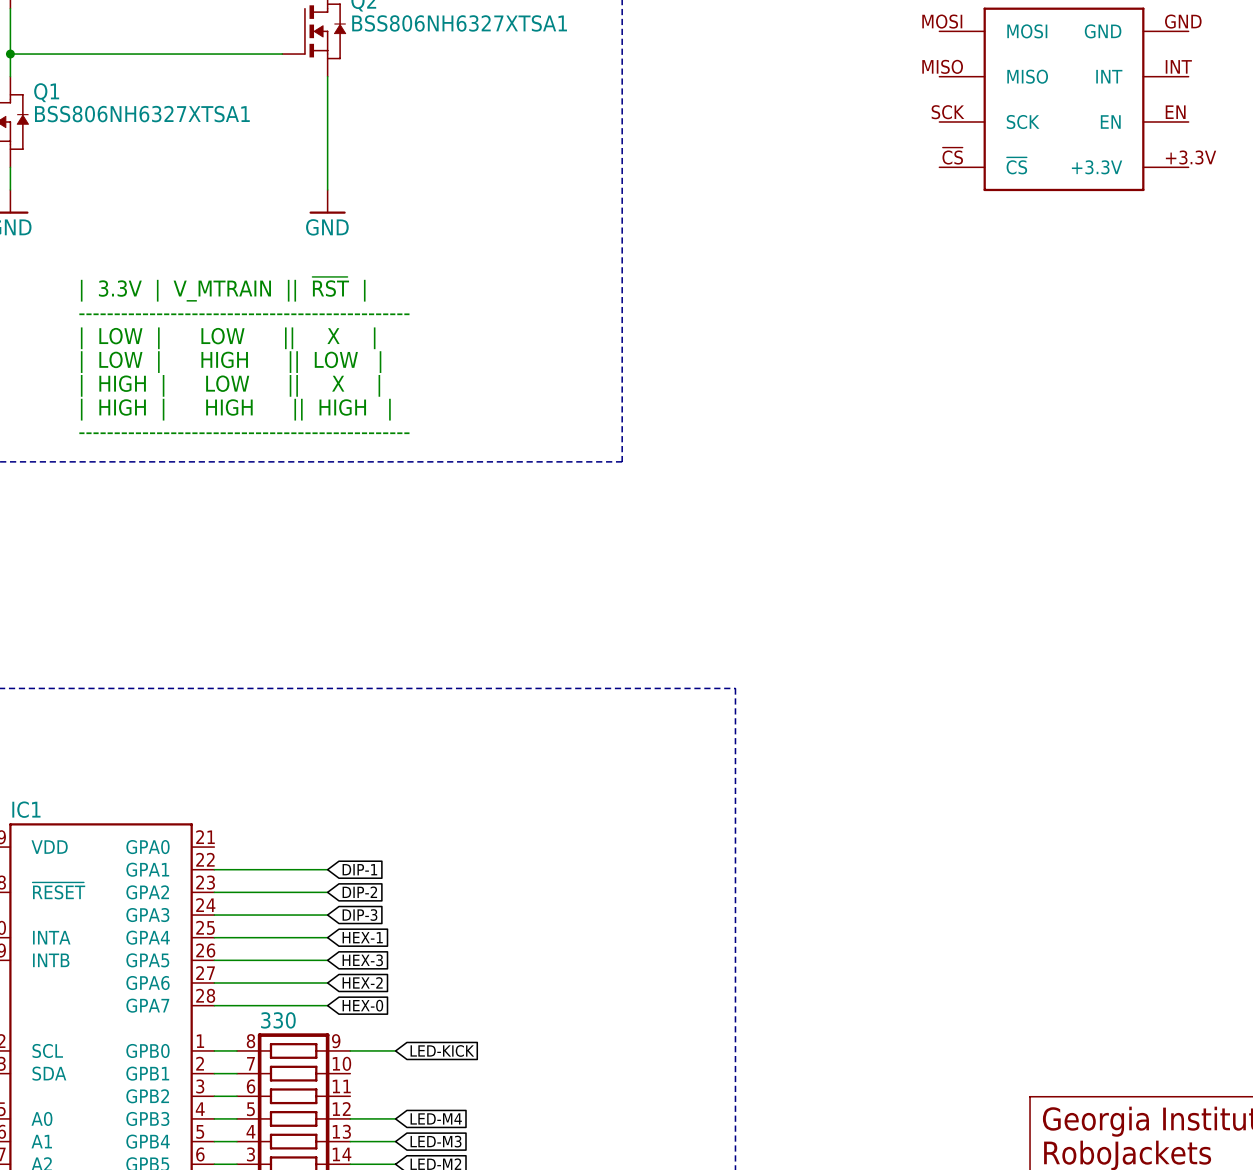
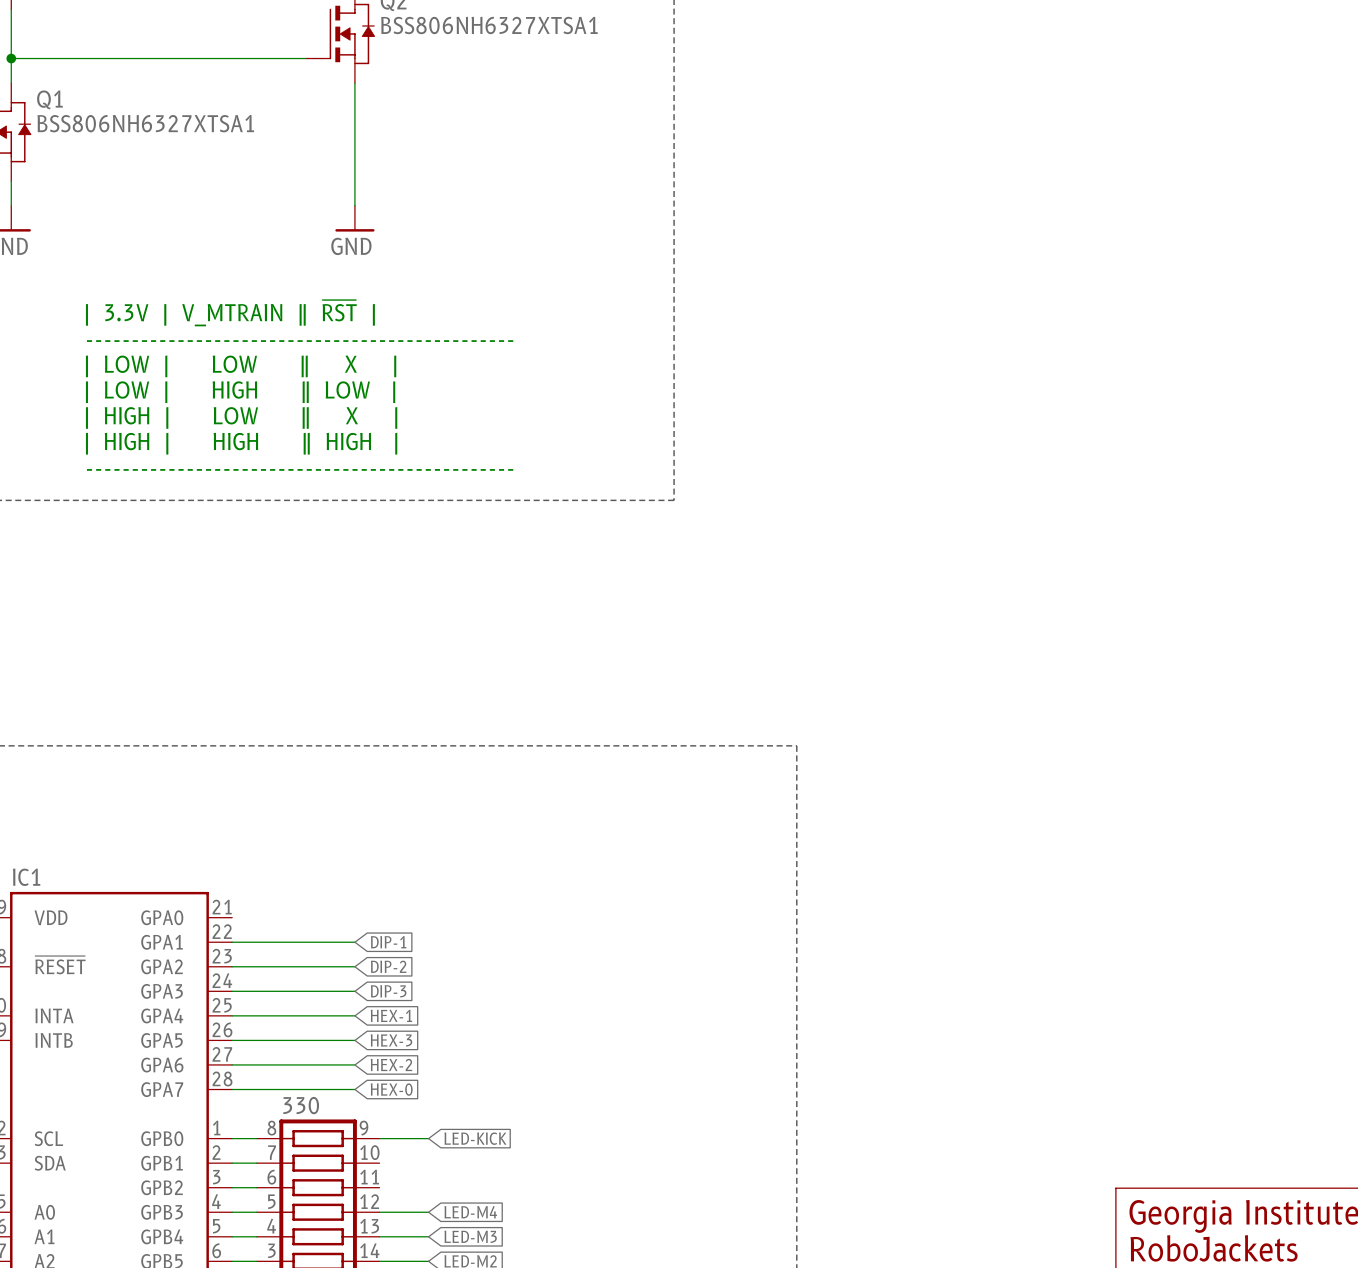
part: (1064, 99) -> none

